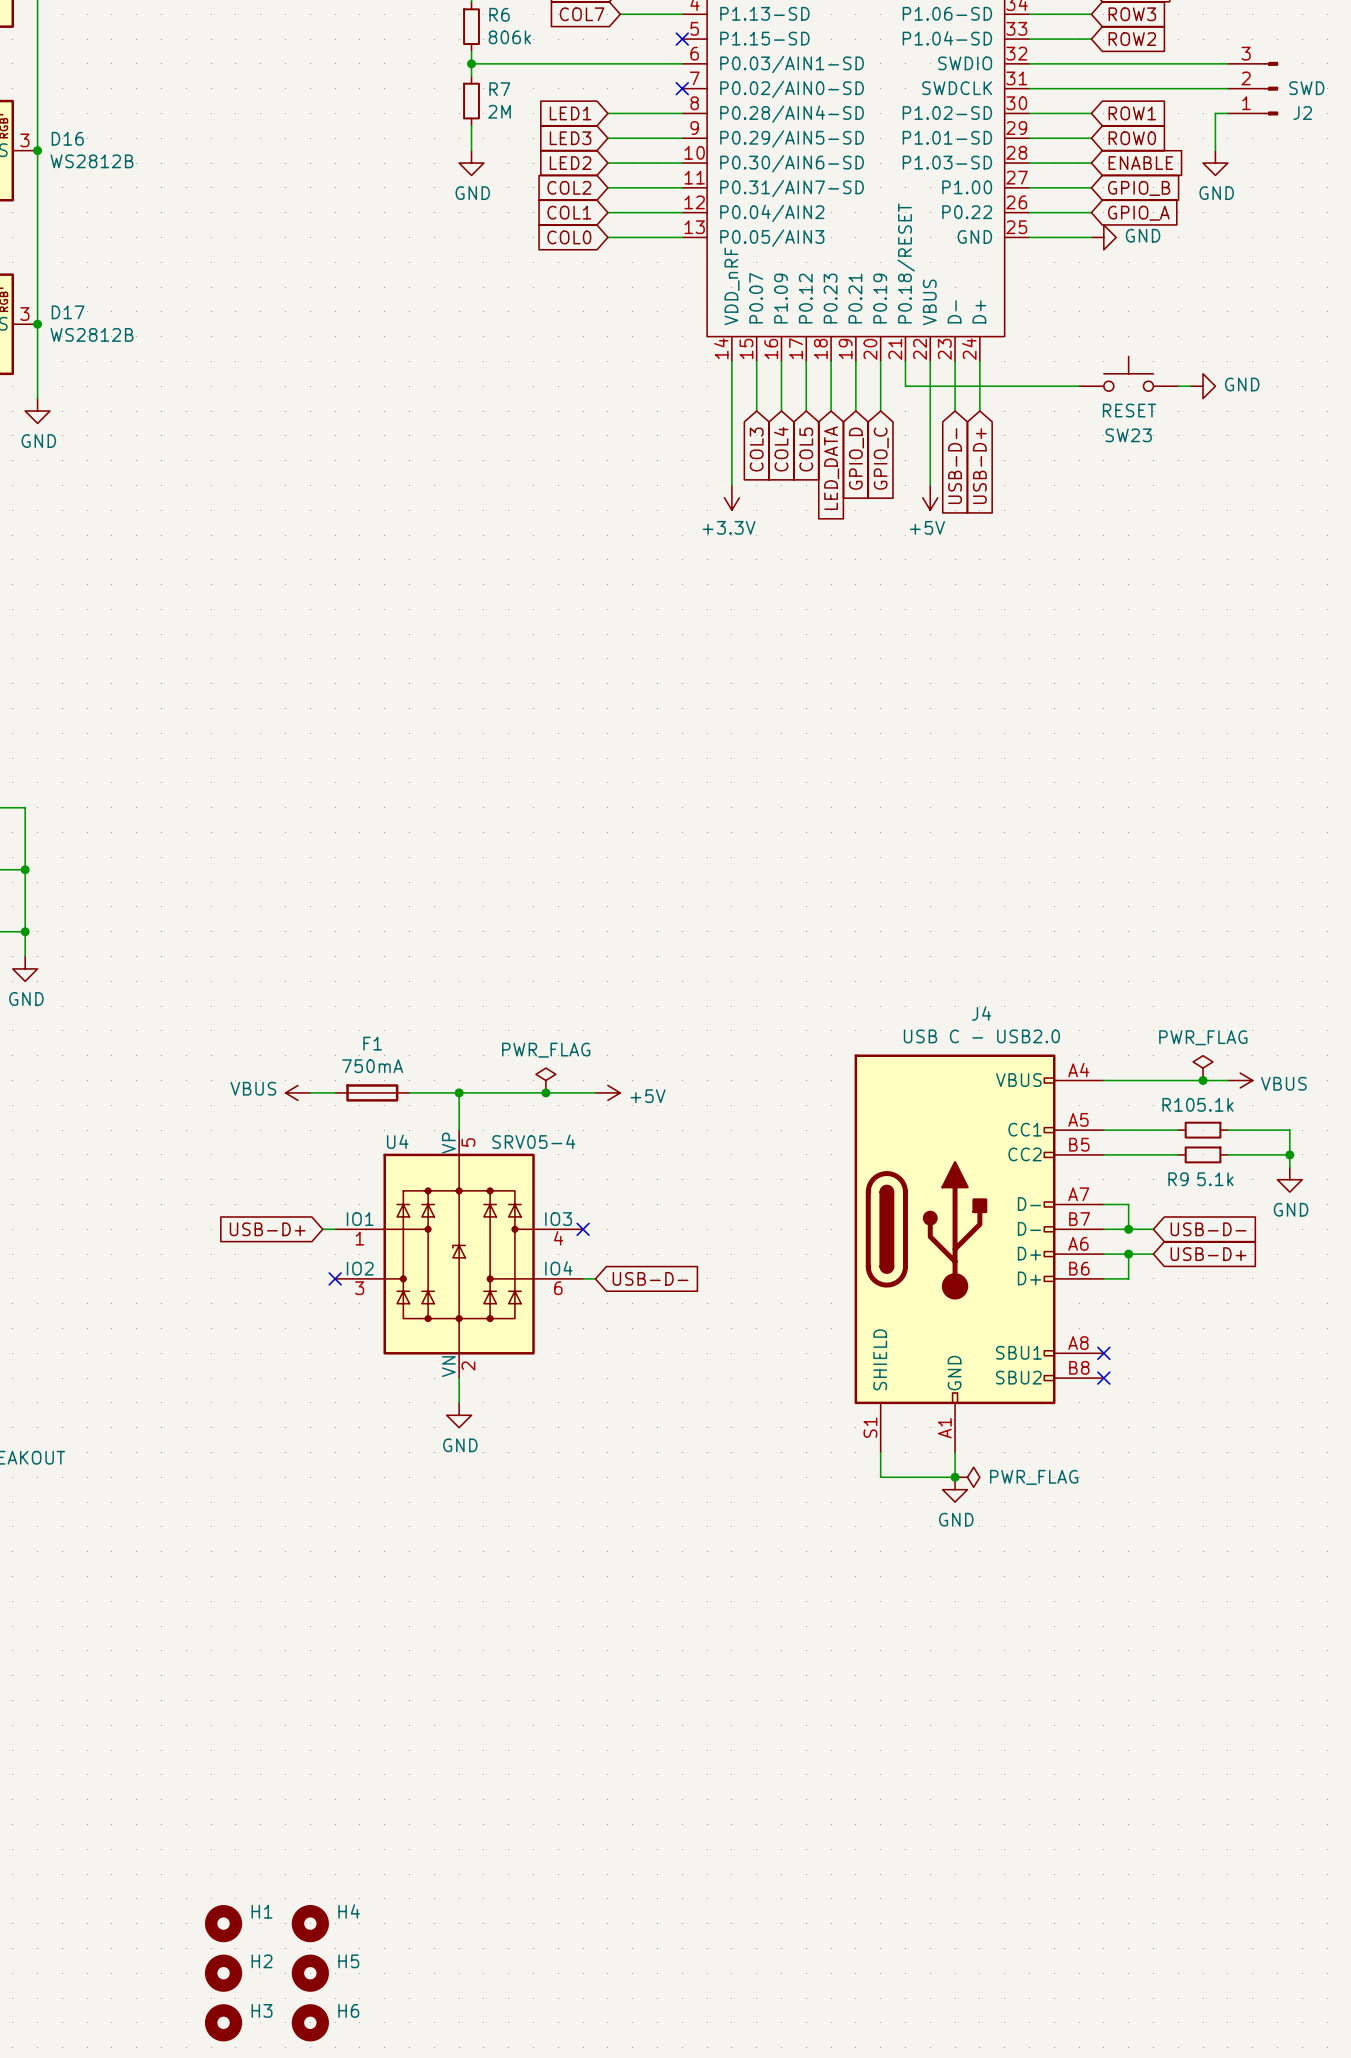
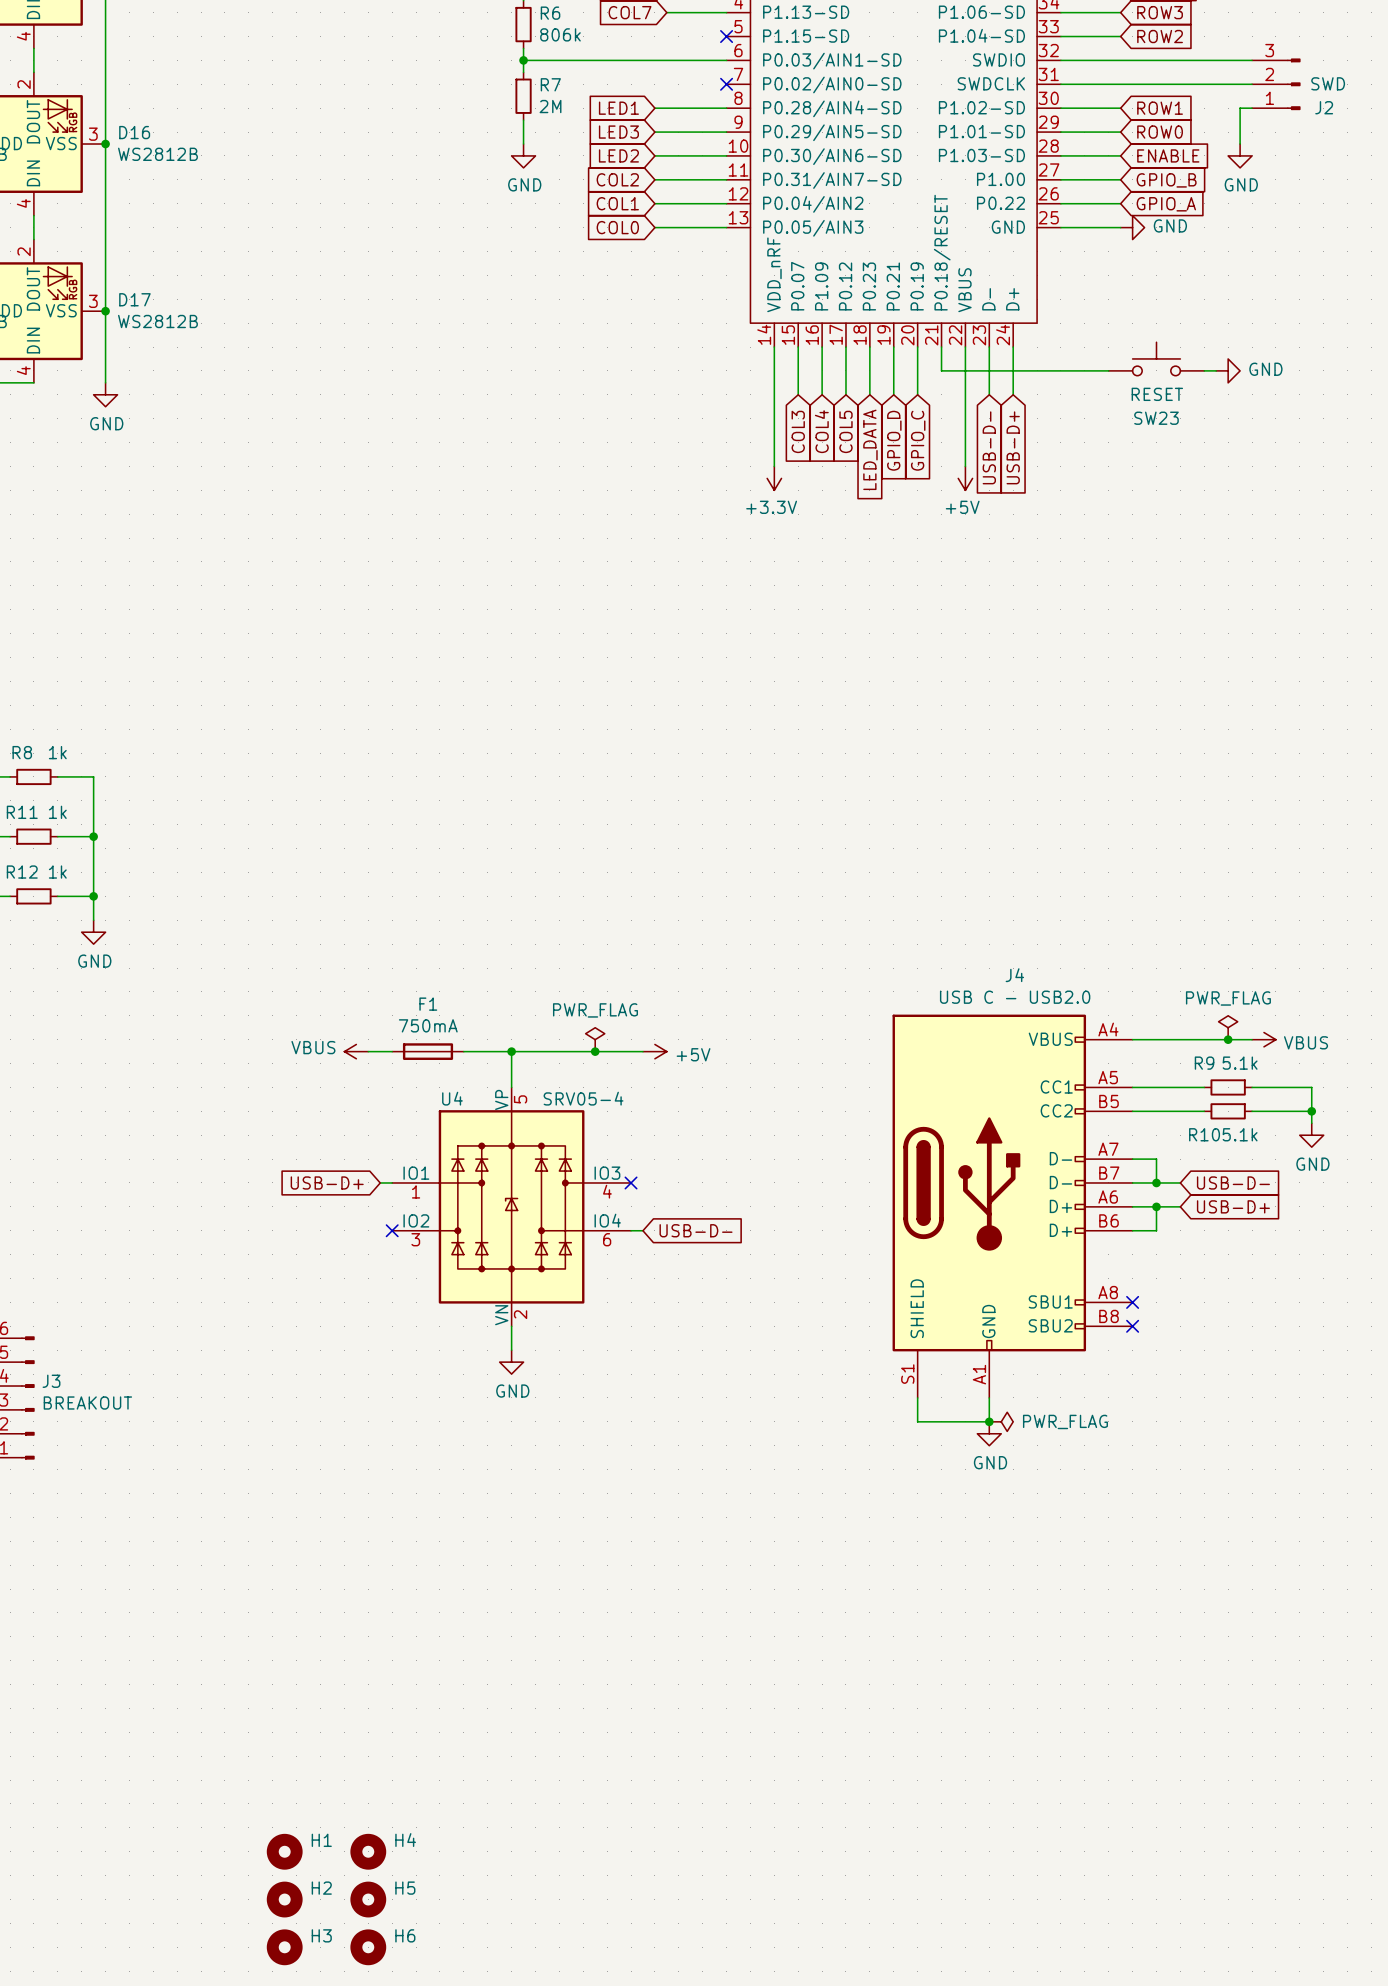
R10 name: R10 (1178, 1104) -> R9 (1204, 1063)
R9 name: R9 (1178, 1179) -> R10 (1204, 1134)

